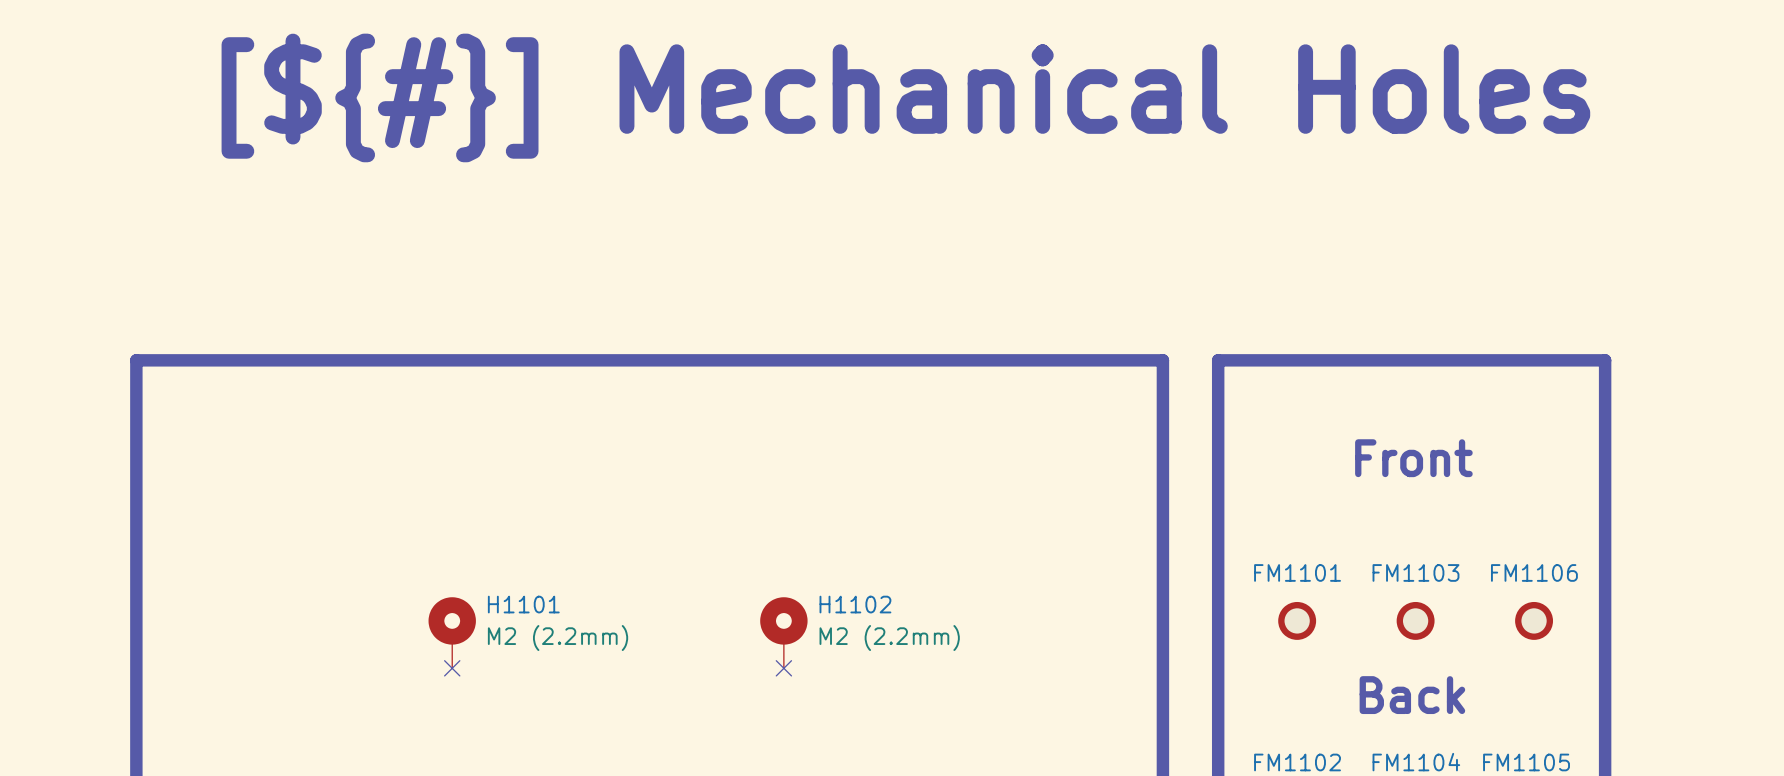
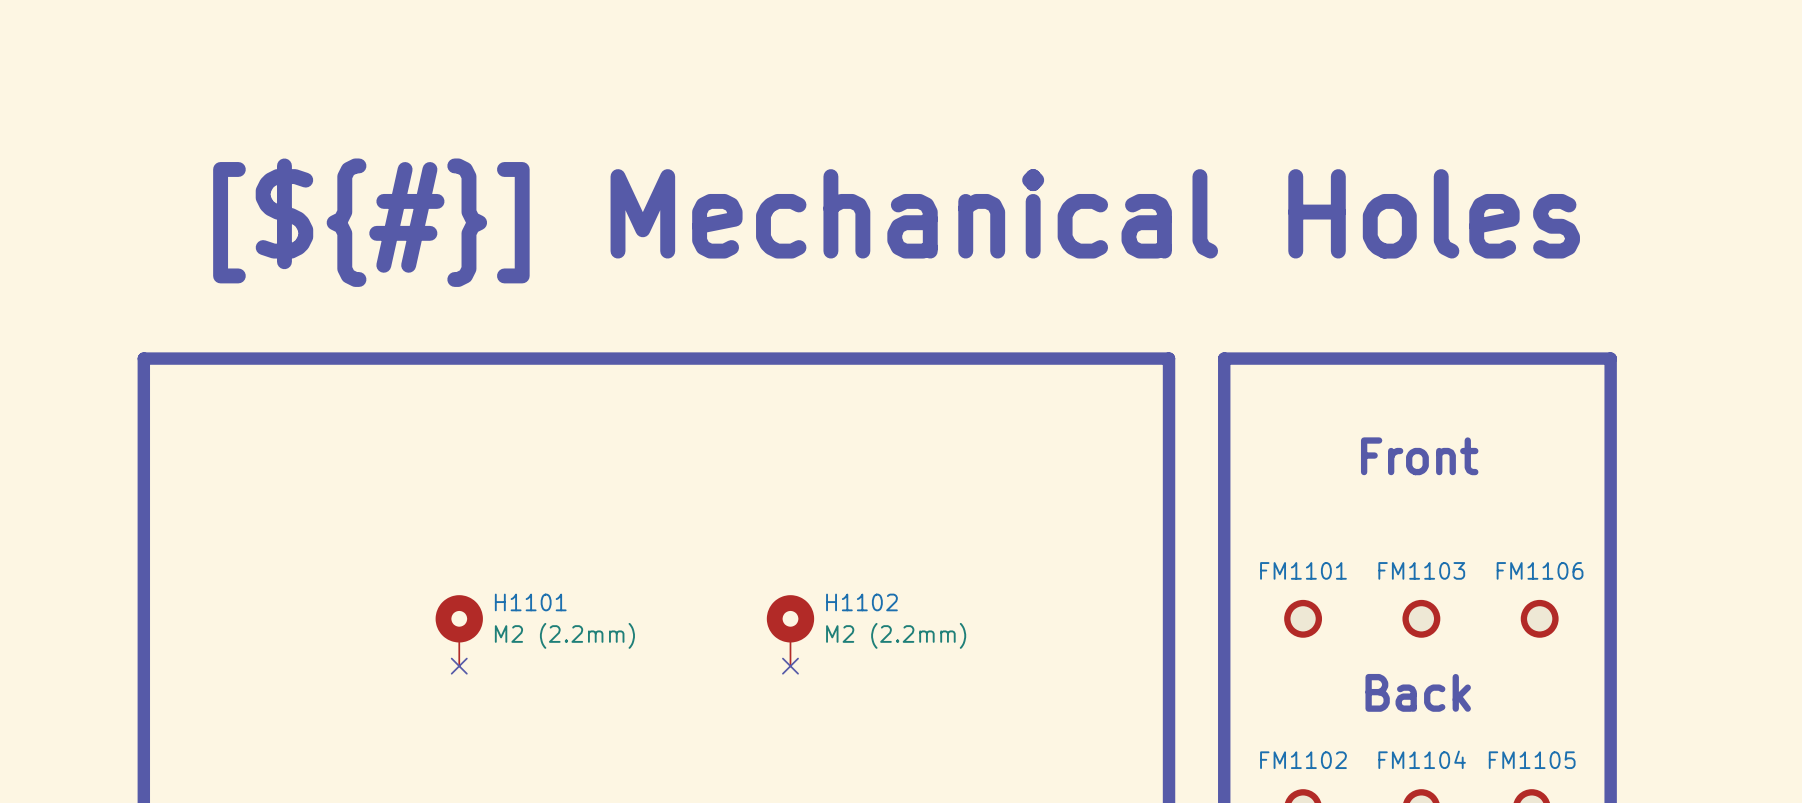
text position: [${#}] Mechanical Holes (905, 97) -> [${#}] Mechanical Holes (896, 222)

